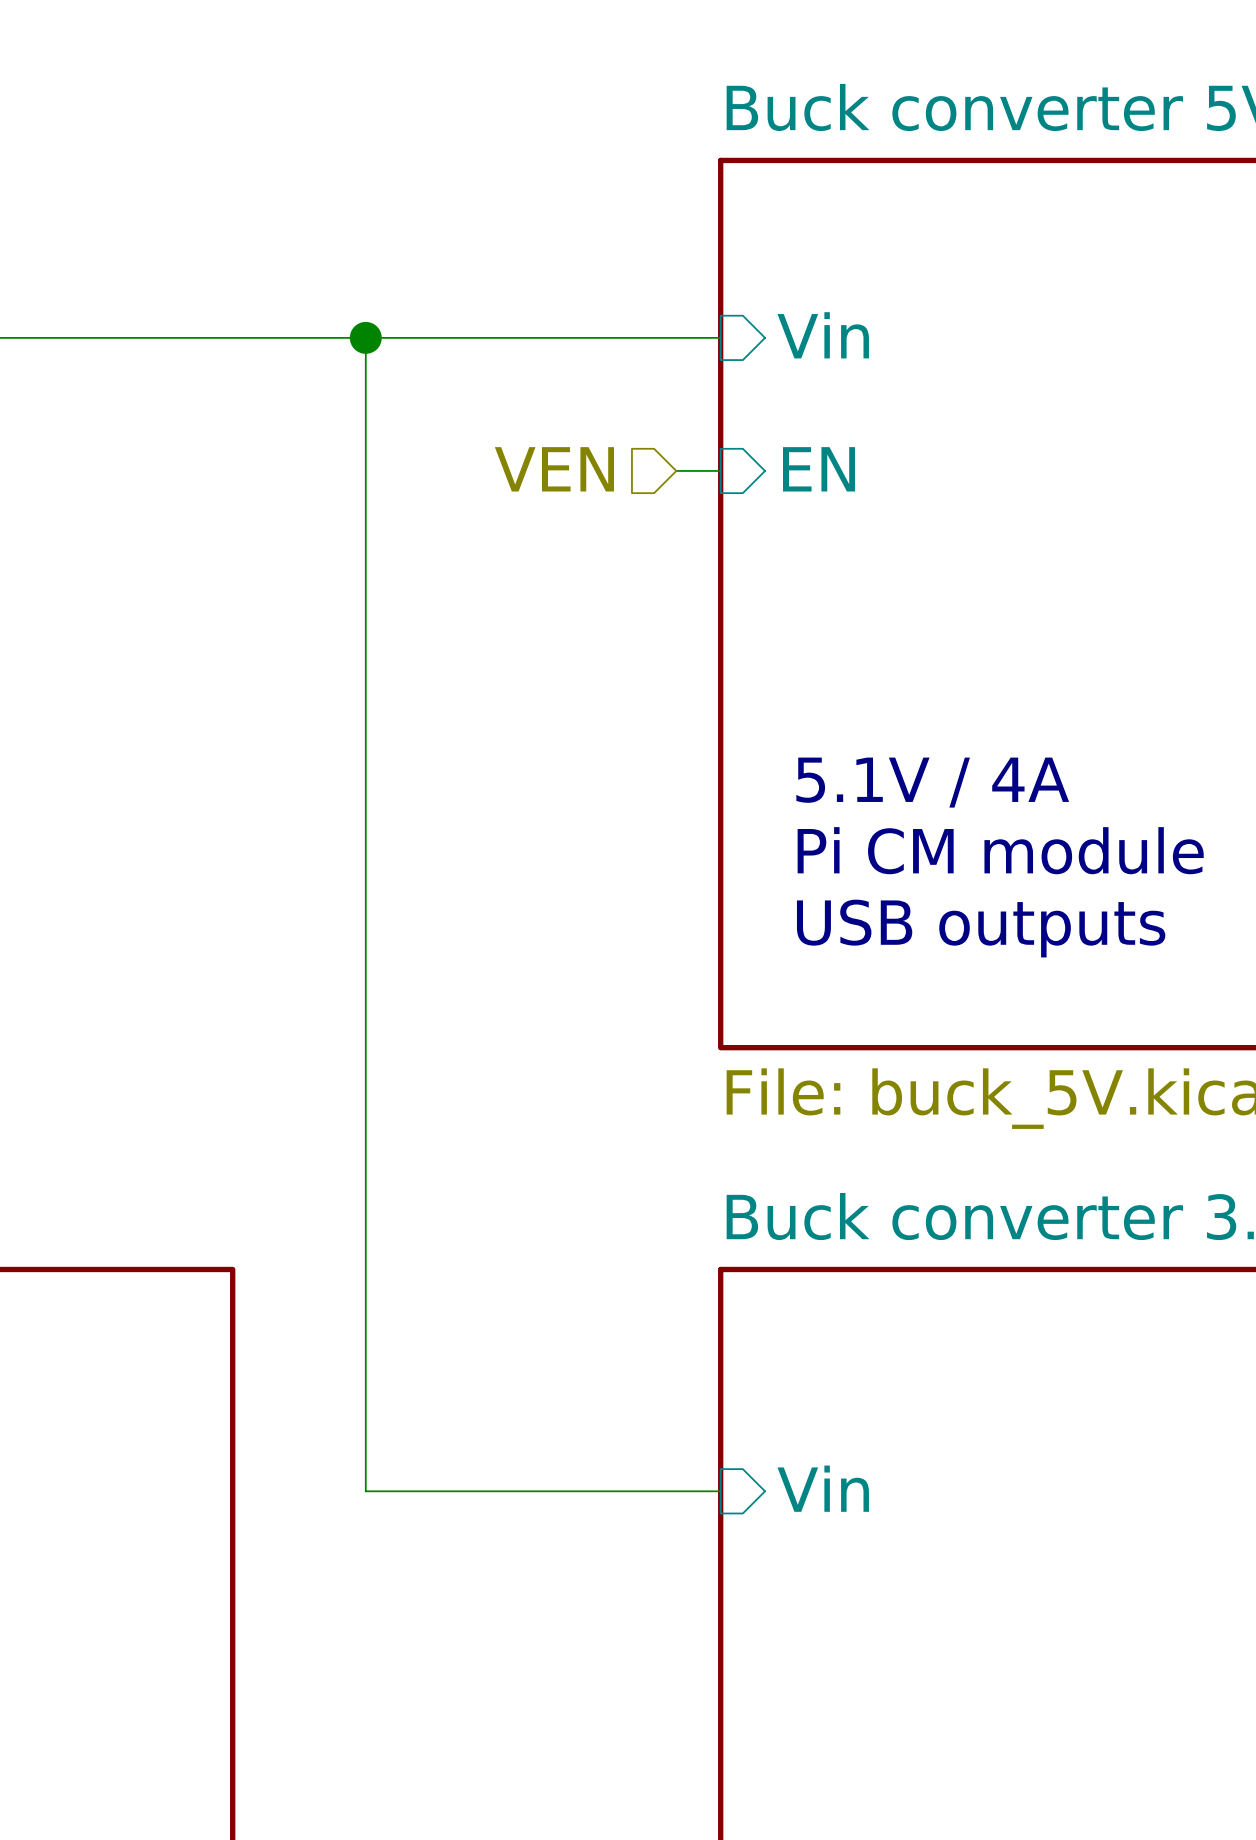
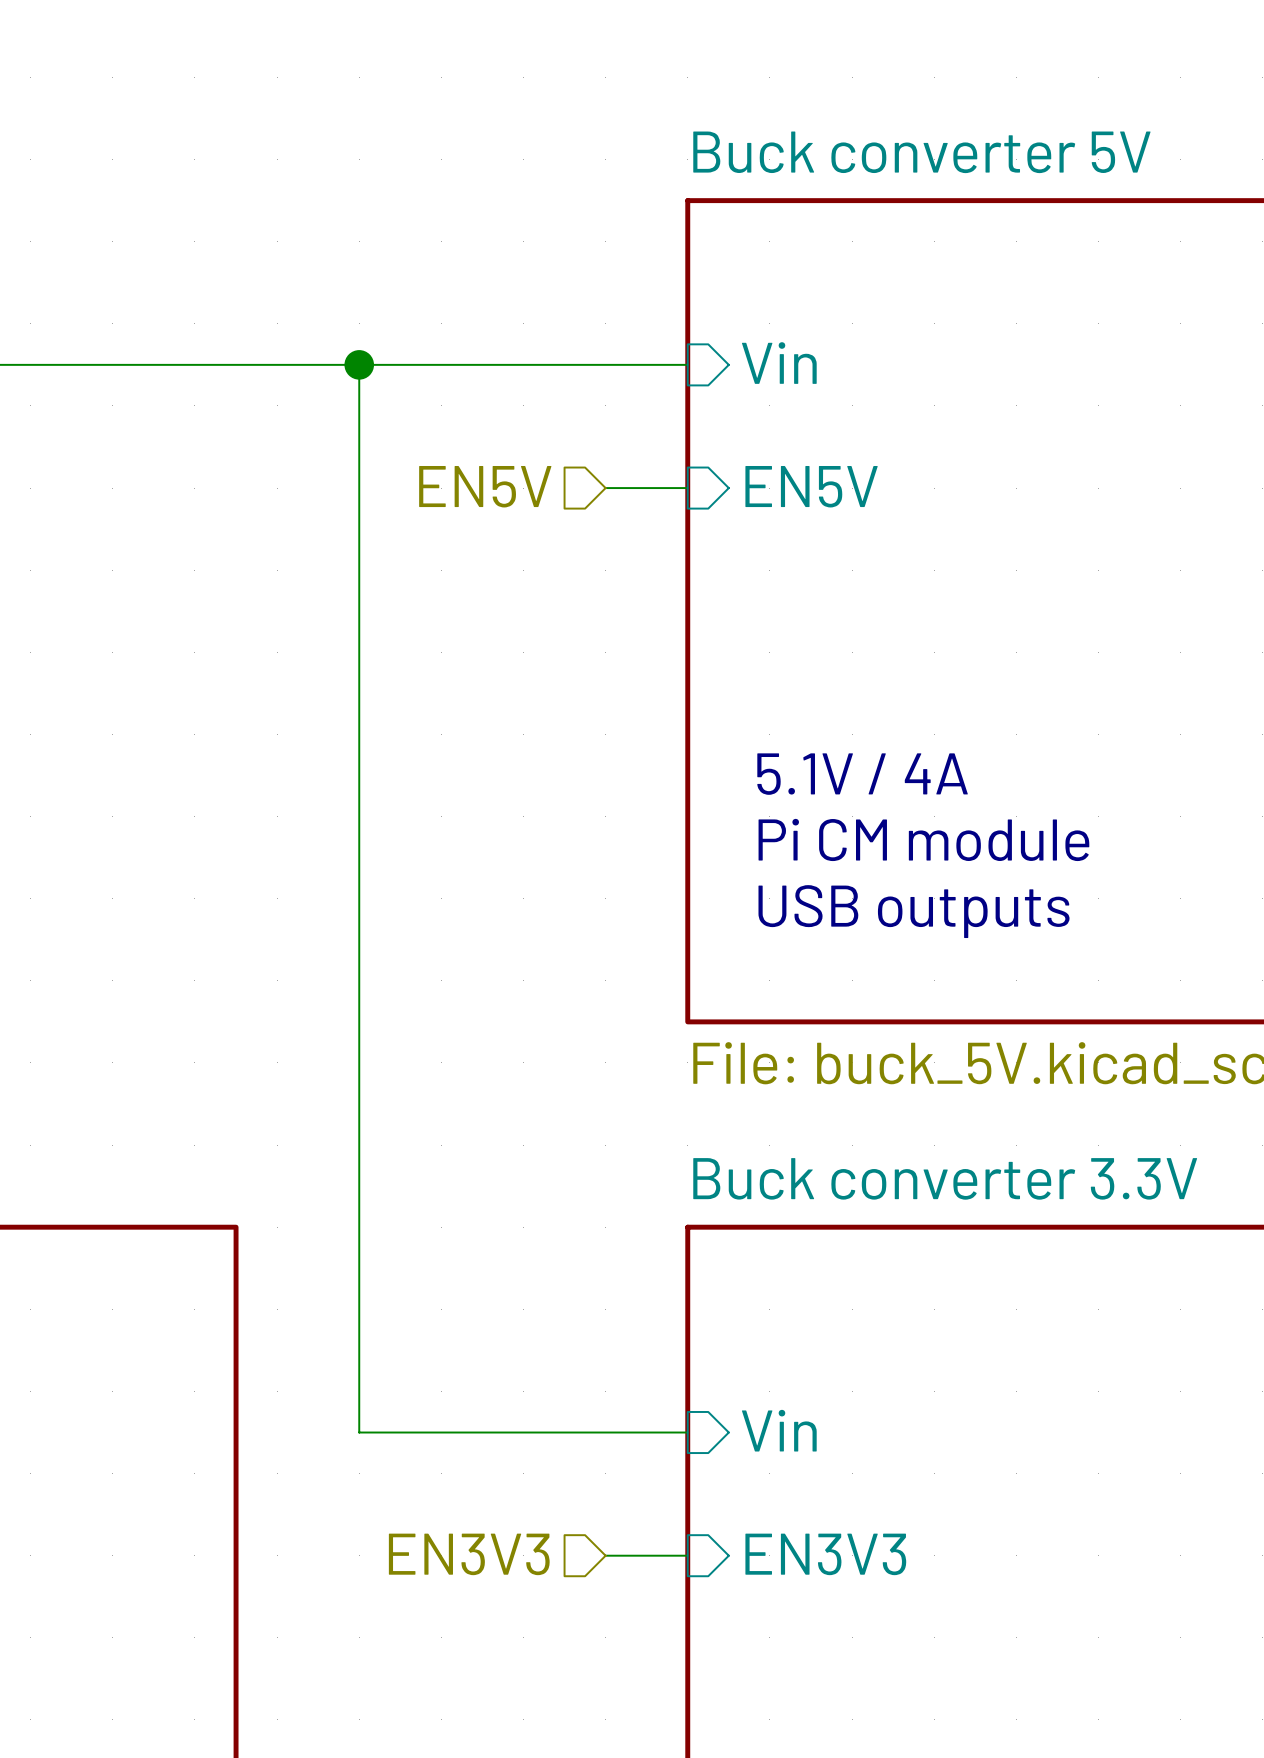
hierarchical label: none -> EN5V (485, 486)
hierarchical label: VEN (554, 469) -> none
sheet pin: EN (819, 469) -> EN5V (811, 486)
wire: none -> (605, 488) (646, 488)
hierarchical label: none -> EN3V3 (469, 1554)
sheet pin: none -> EN3V3 (825, 1554)
wire: none -> (605, 1555) (687, 1555)

